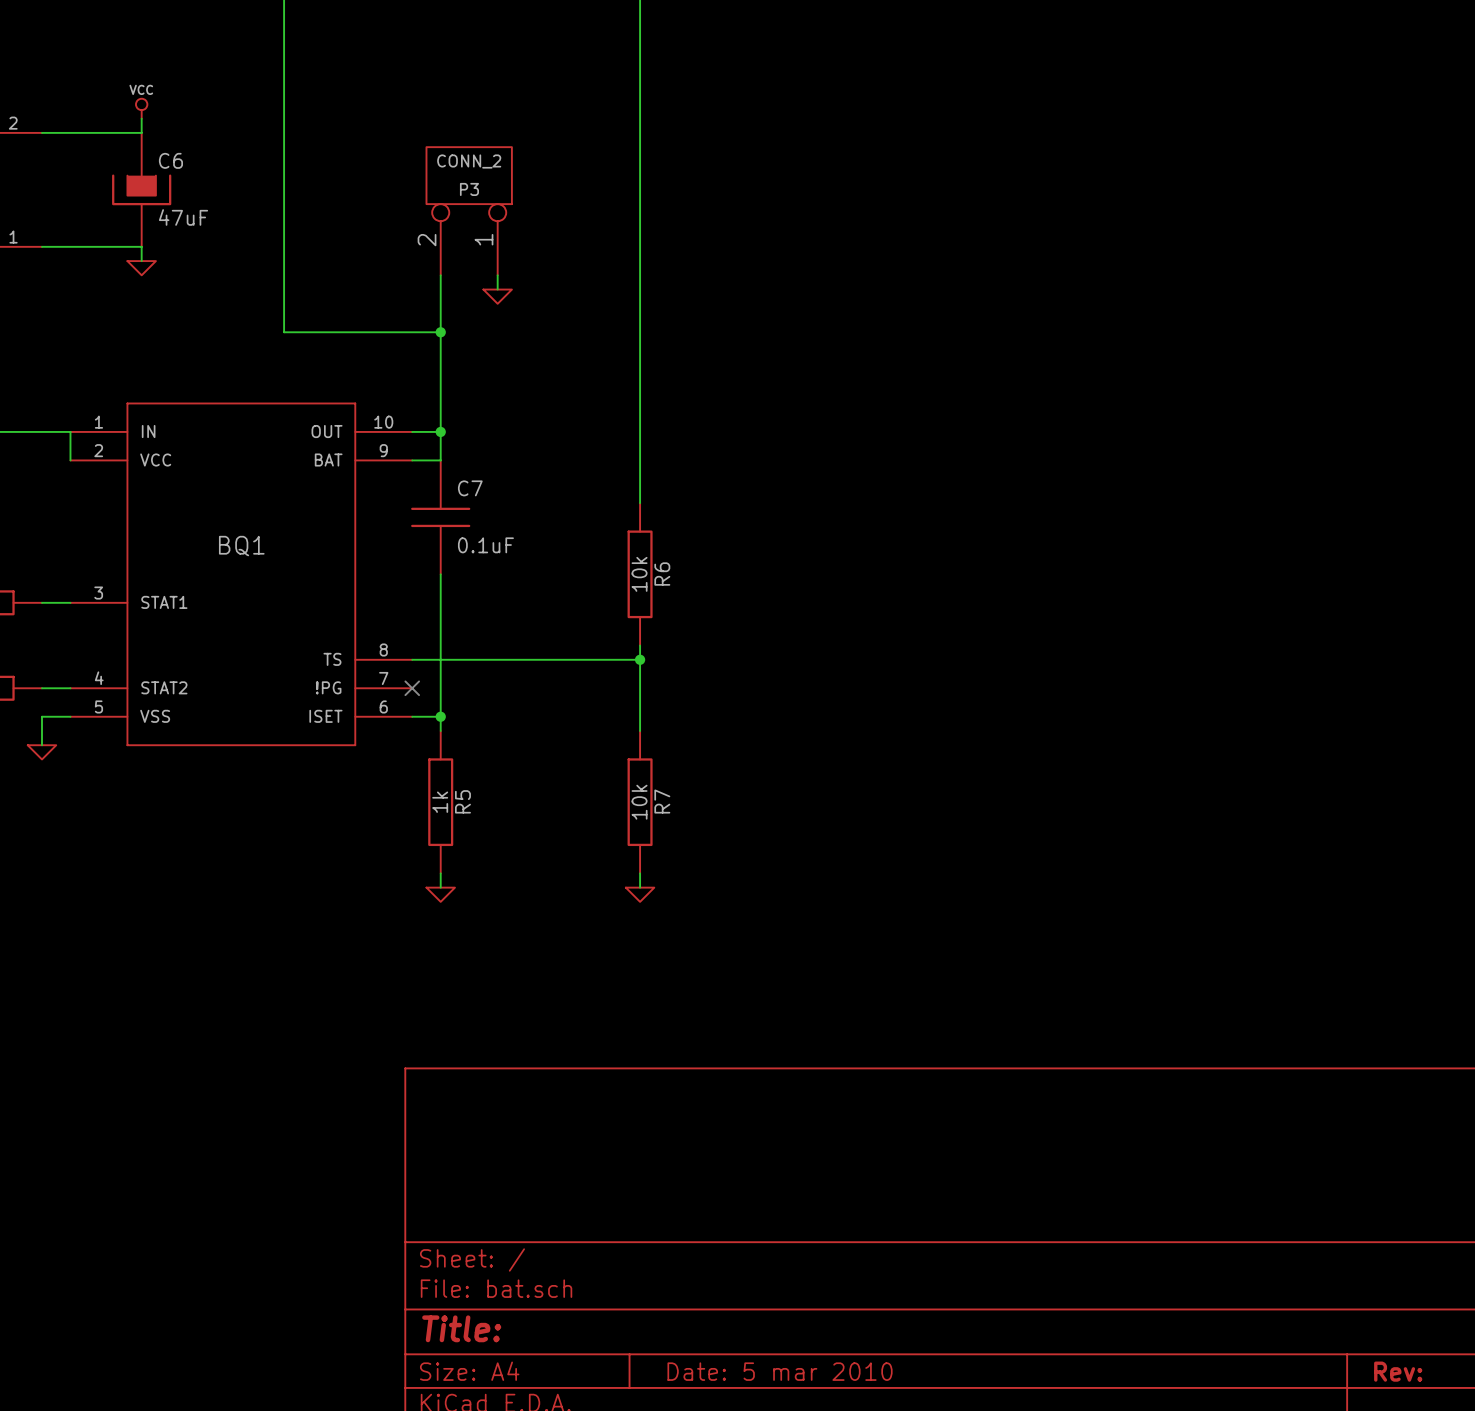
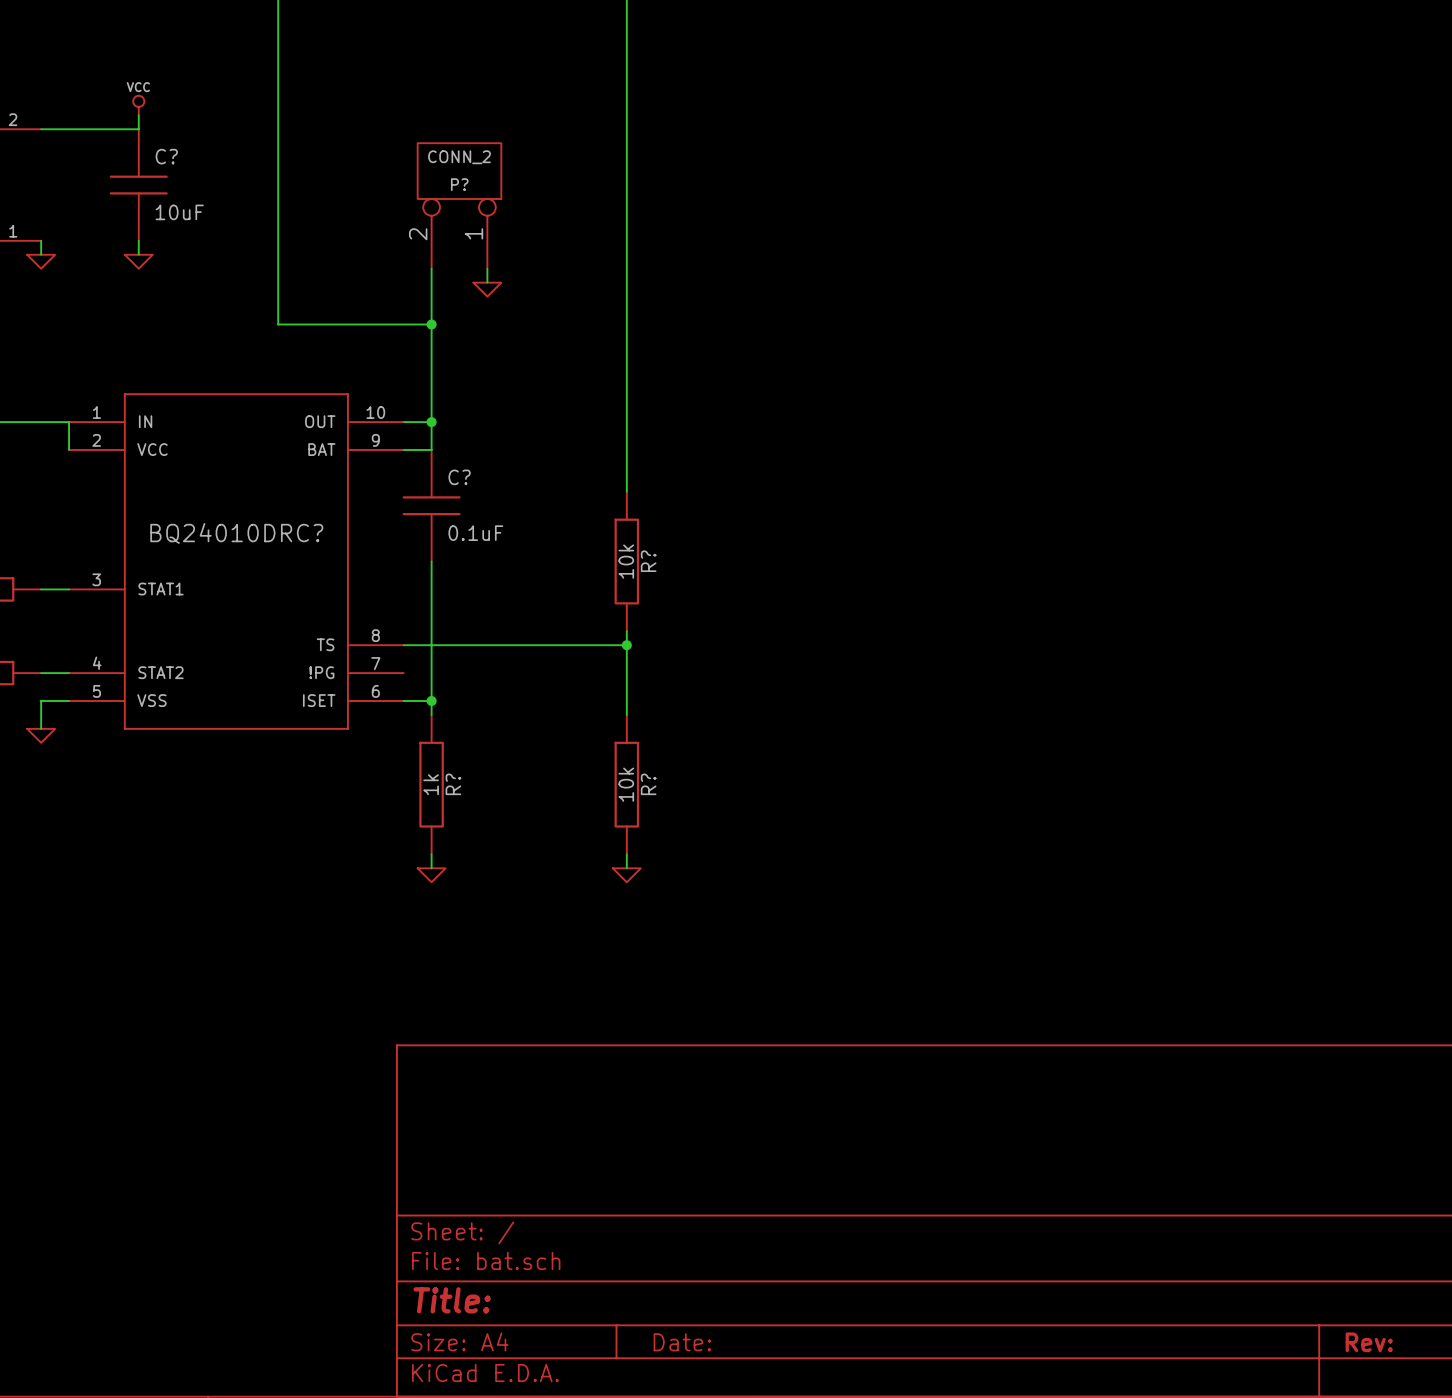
C6: 47uF (141, 189) -> none
C?: none -> 10uF (138, 185)
P3 name: P3 (469, 189) -> P? (459, 184)
wire: (42, 246) (141, 246) -> (41, 240) (41, 254)
power symbol: none -> (41, 261)
C7 name: C7 (470, 488) -> C? (459, 477)
BQ1 name: BQ1 (241, 546) -> BQ24010DRC? (236, 533)
R6 name: R6 (662, 574) -> R? (648, 561)
no-connect mark: (412, 688) -> none
R5 name: R5 (462, 801) -> R? (453, 784)
R7 name: R7 (662, 801) -> R? (648, 784)
title block: Date: 5 mar 2010 (780, 1371) -> Date: (682, 1342)

